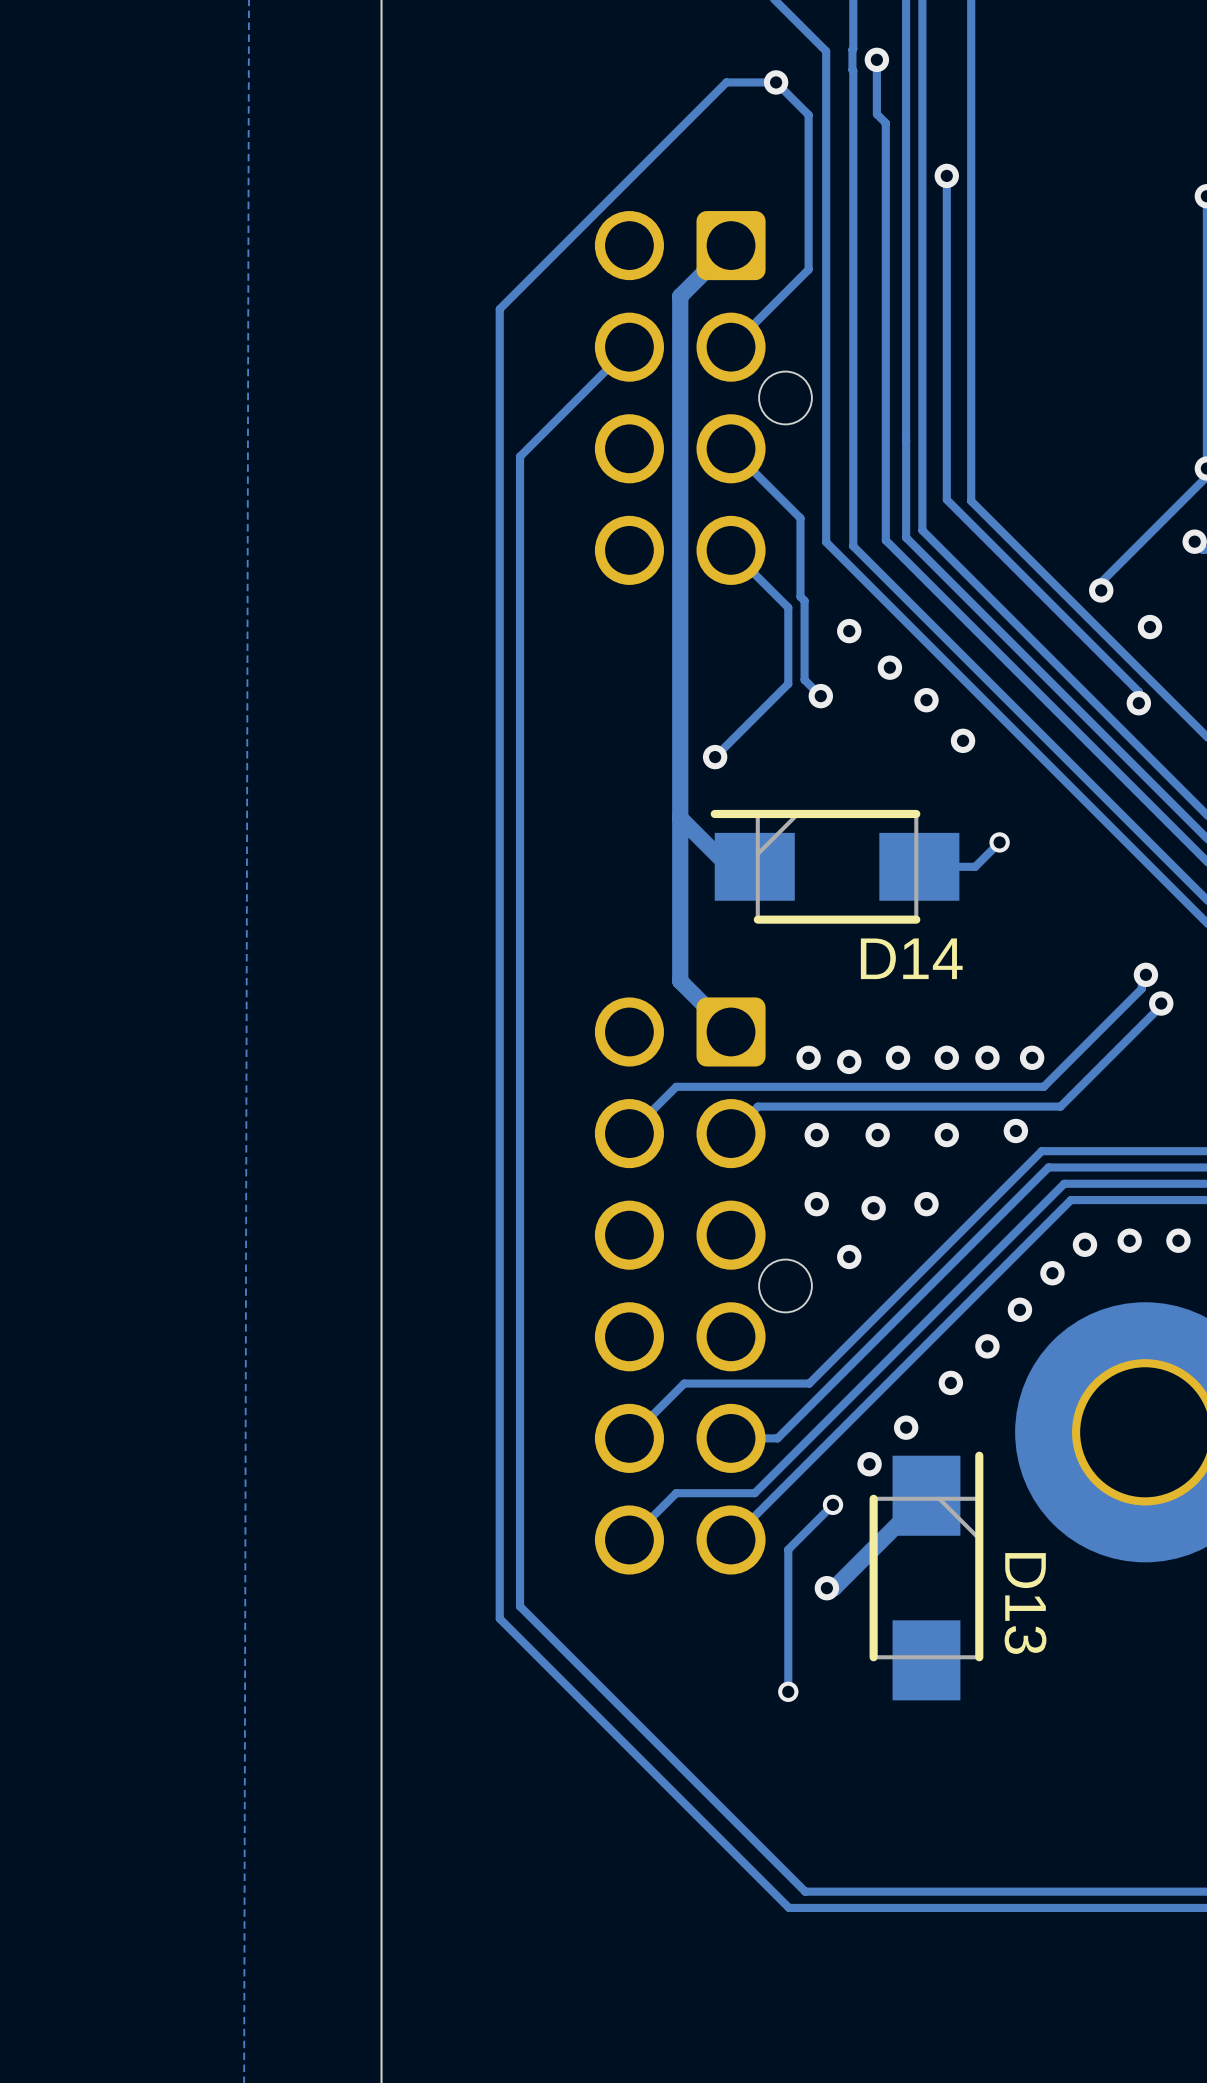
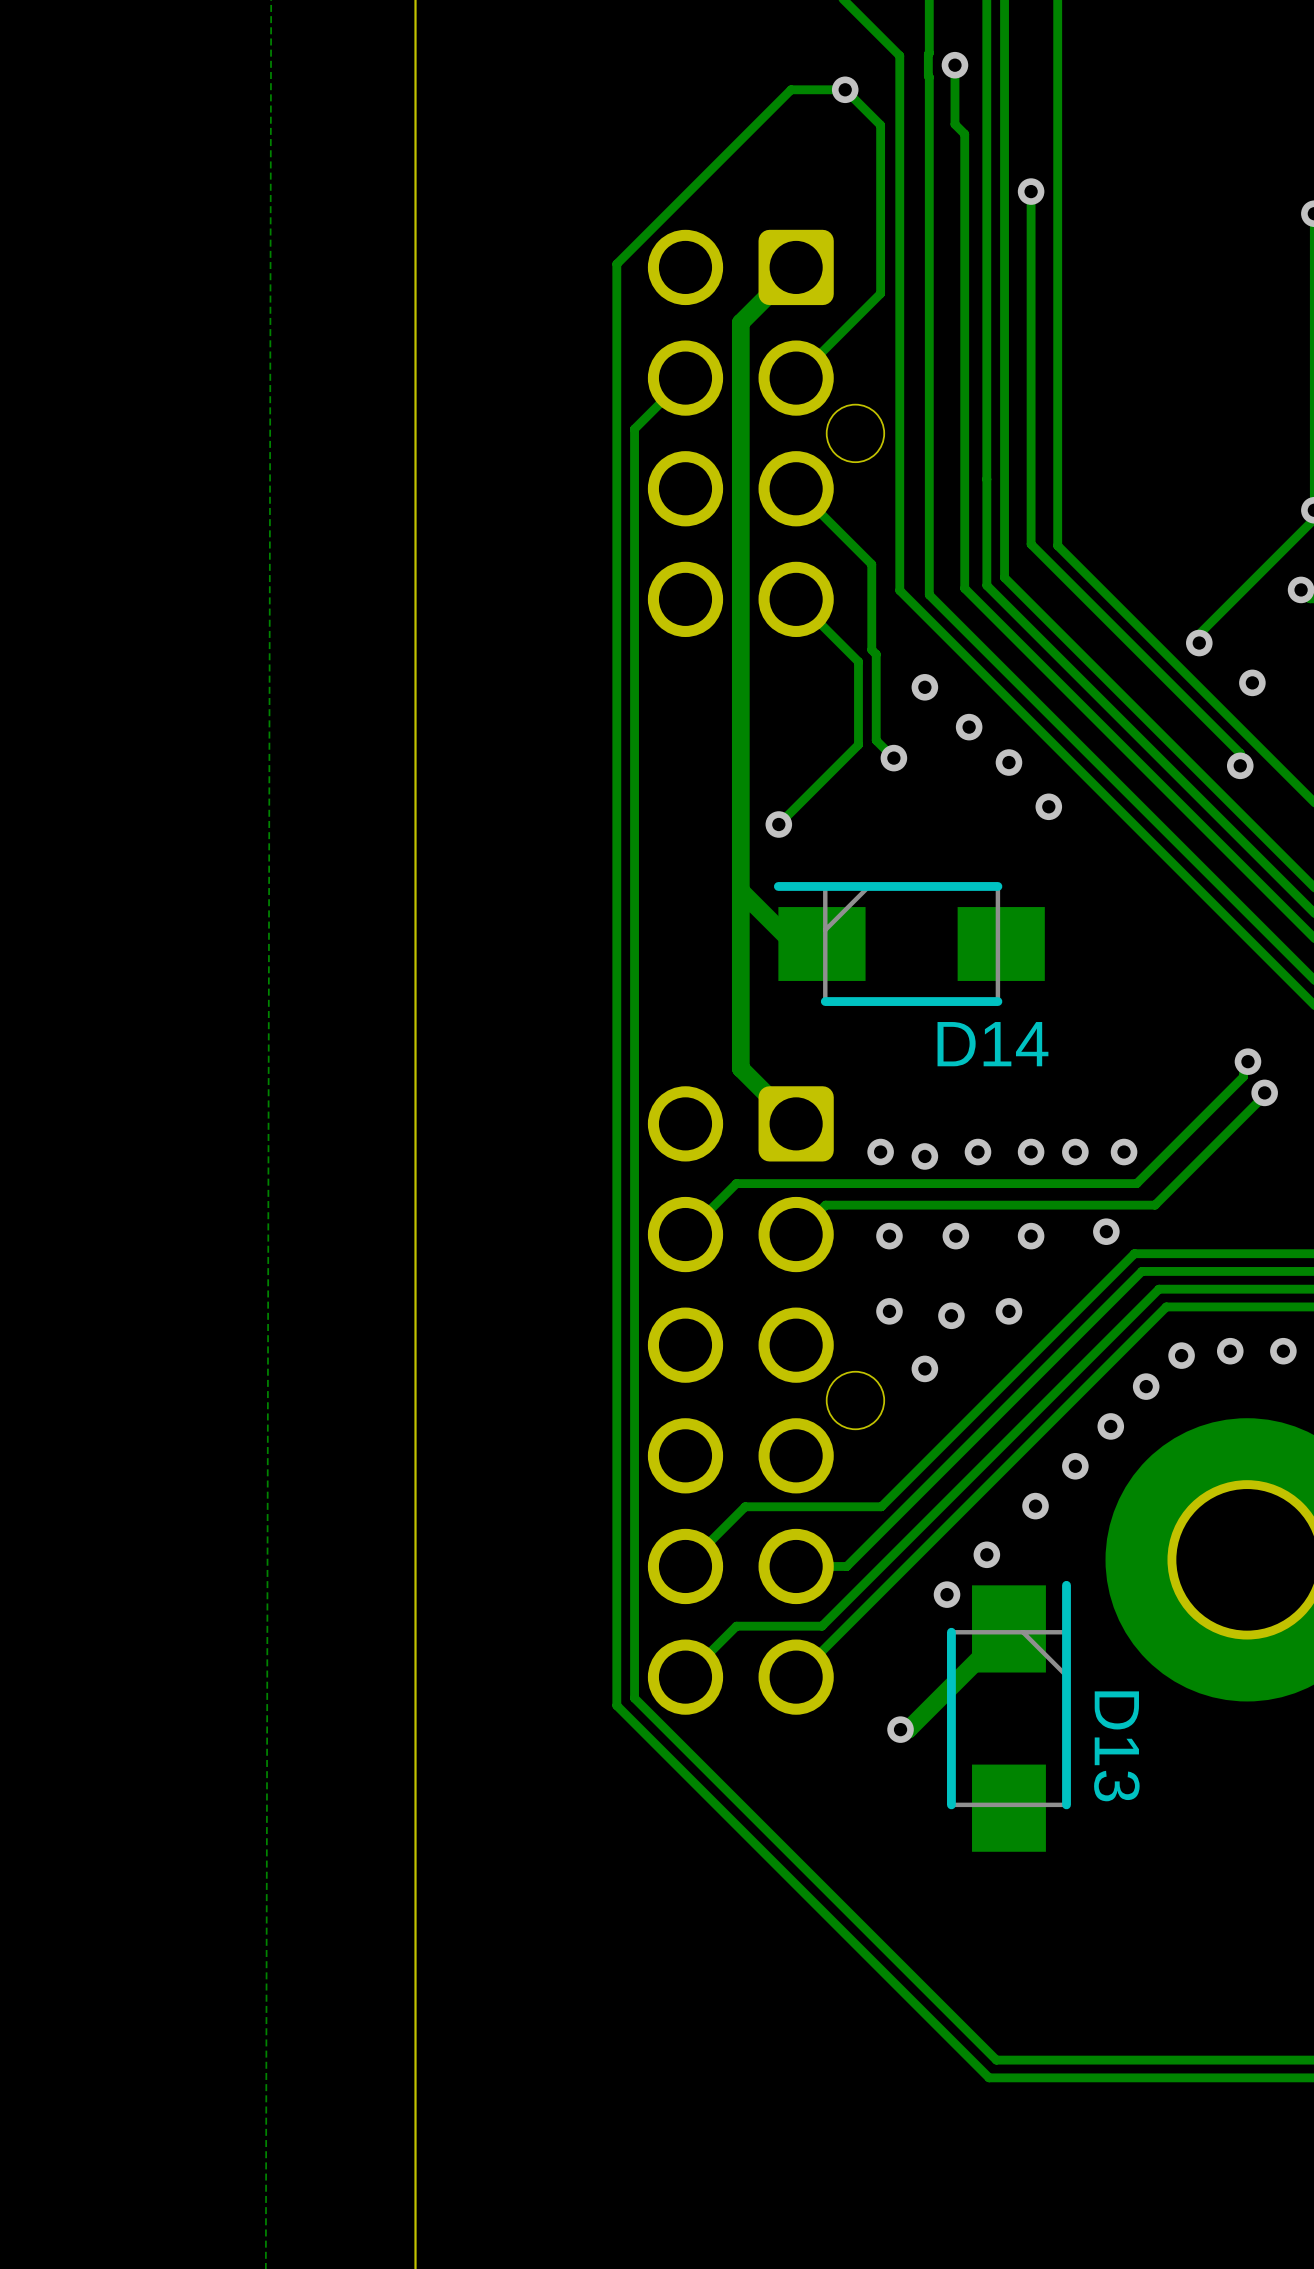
track: (566, 242) (499, 309) (499, 1618) (789, 1907) (908, 1907) -> (616, 264) (616, 1705) (989, 2077)
track: (582, 393) (520, 456) (520, 1606) (805, 1891) (914, 1891) -> (634, 429) (634, 1698) (996, 2060)
track: (999, 842) (975, 866) (919, 866) -> none
via: (999, 842) -> none
track: (832, 1504) (788, 1549) (788, 1691) -> none
via: (832, 1504) -> none
via: (788, 1691) -> none

